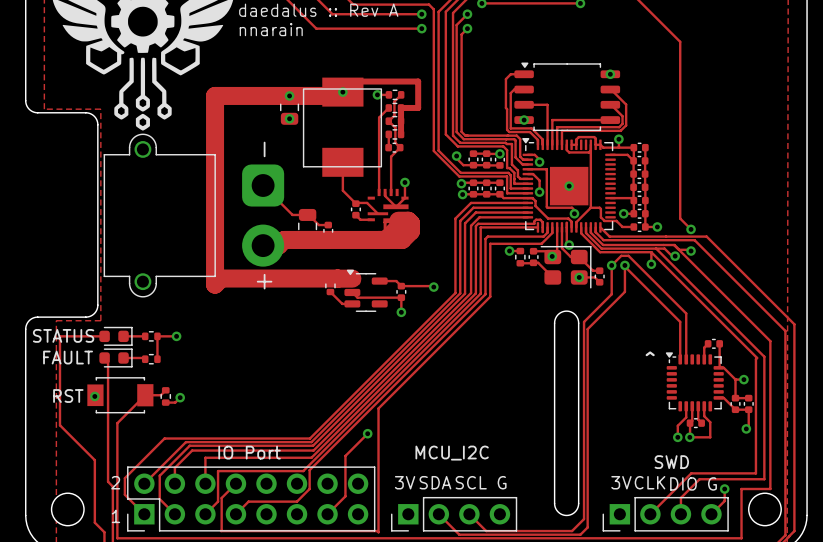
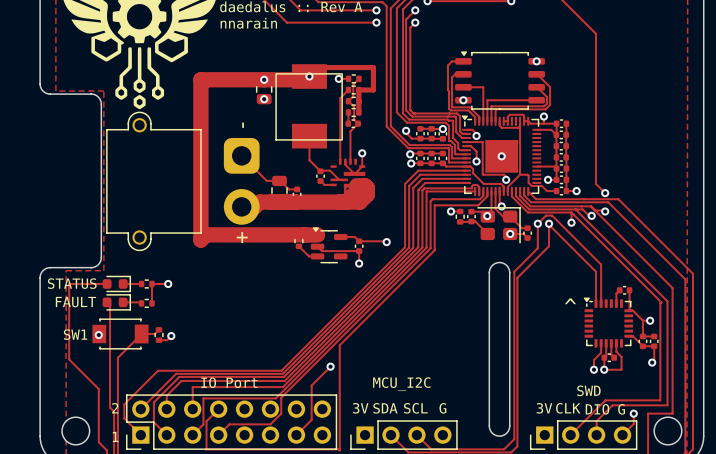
RST name: RST (68, 396) -> SW1 (75, 334)

